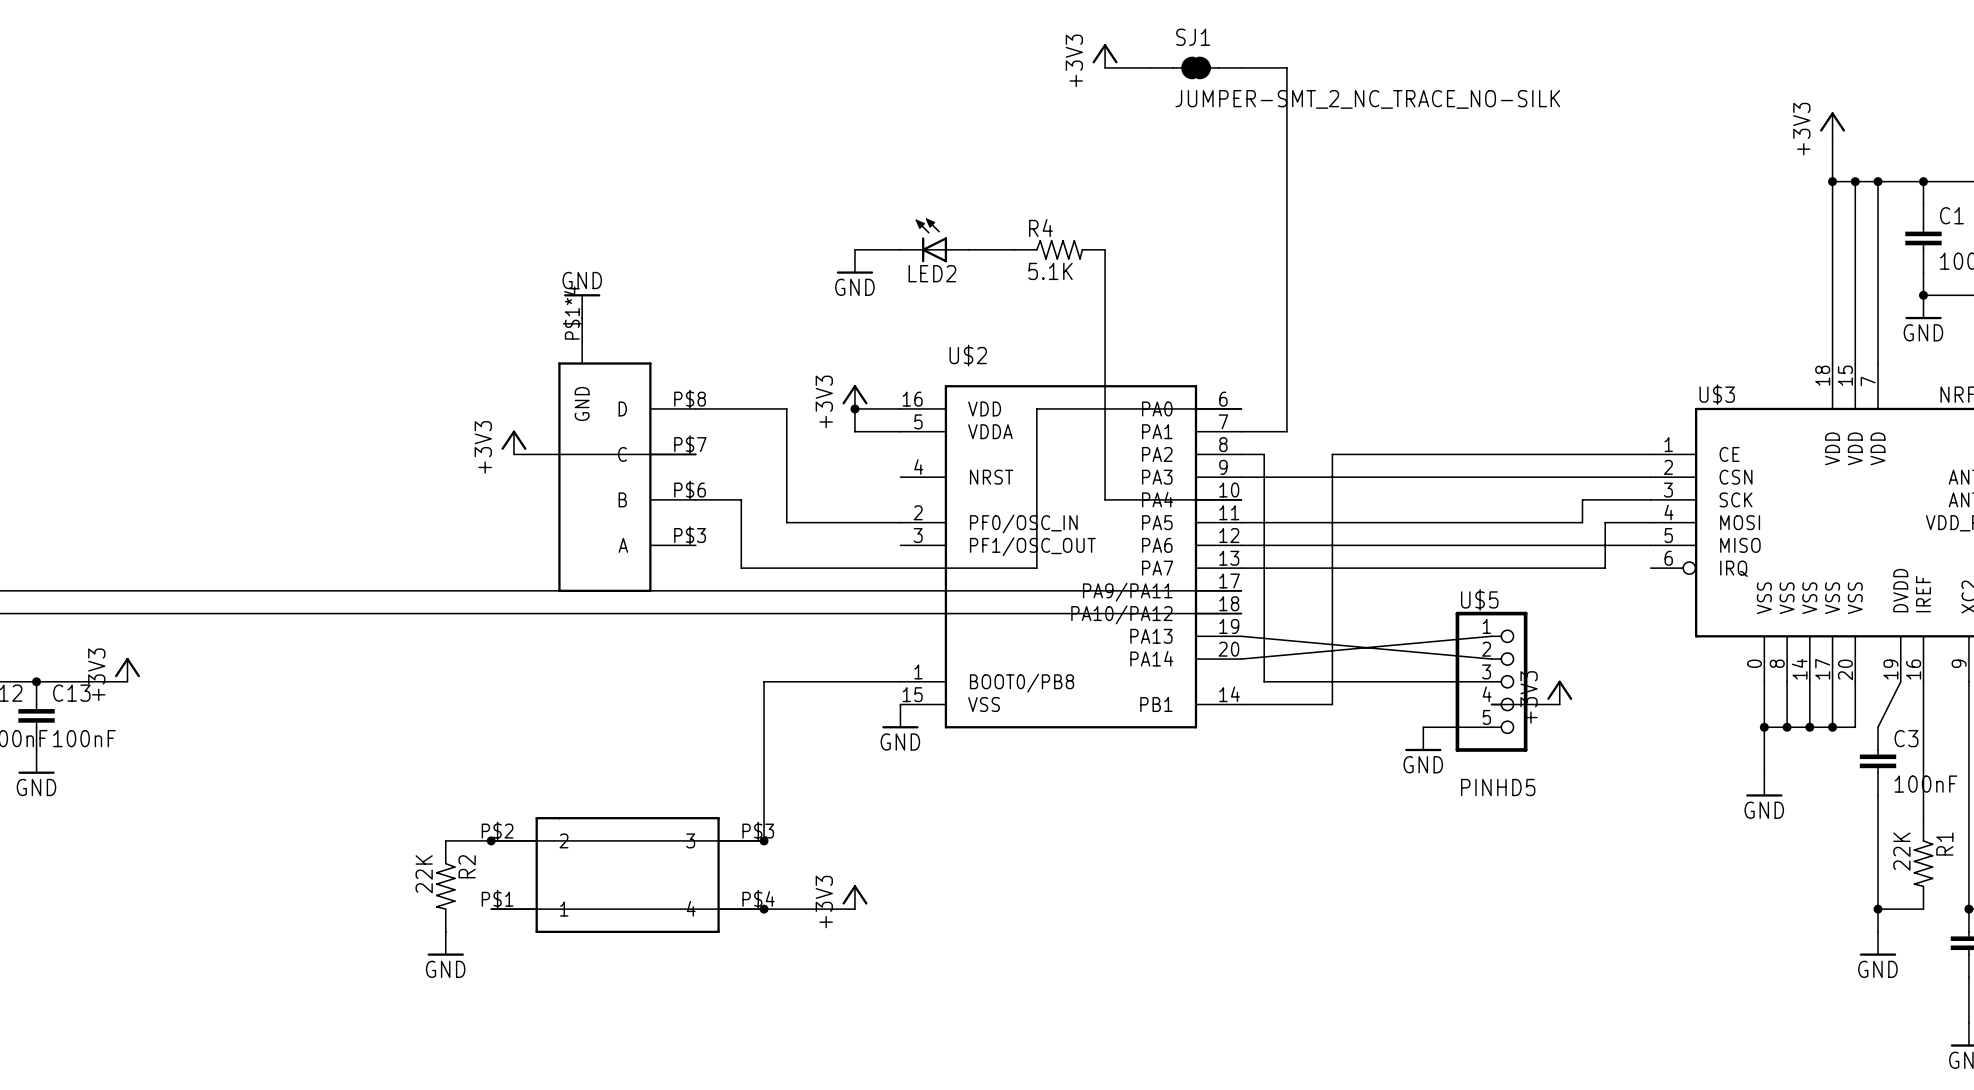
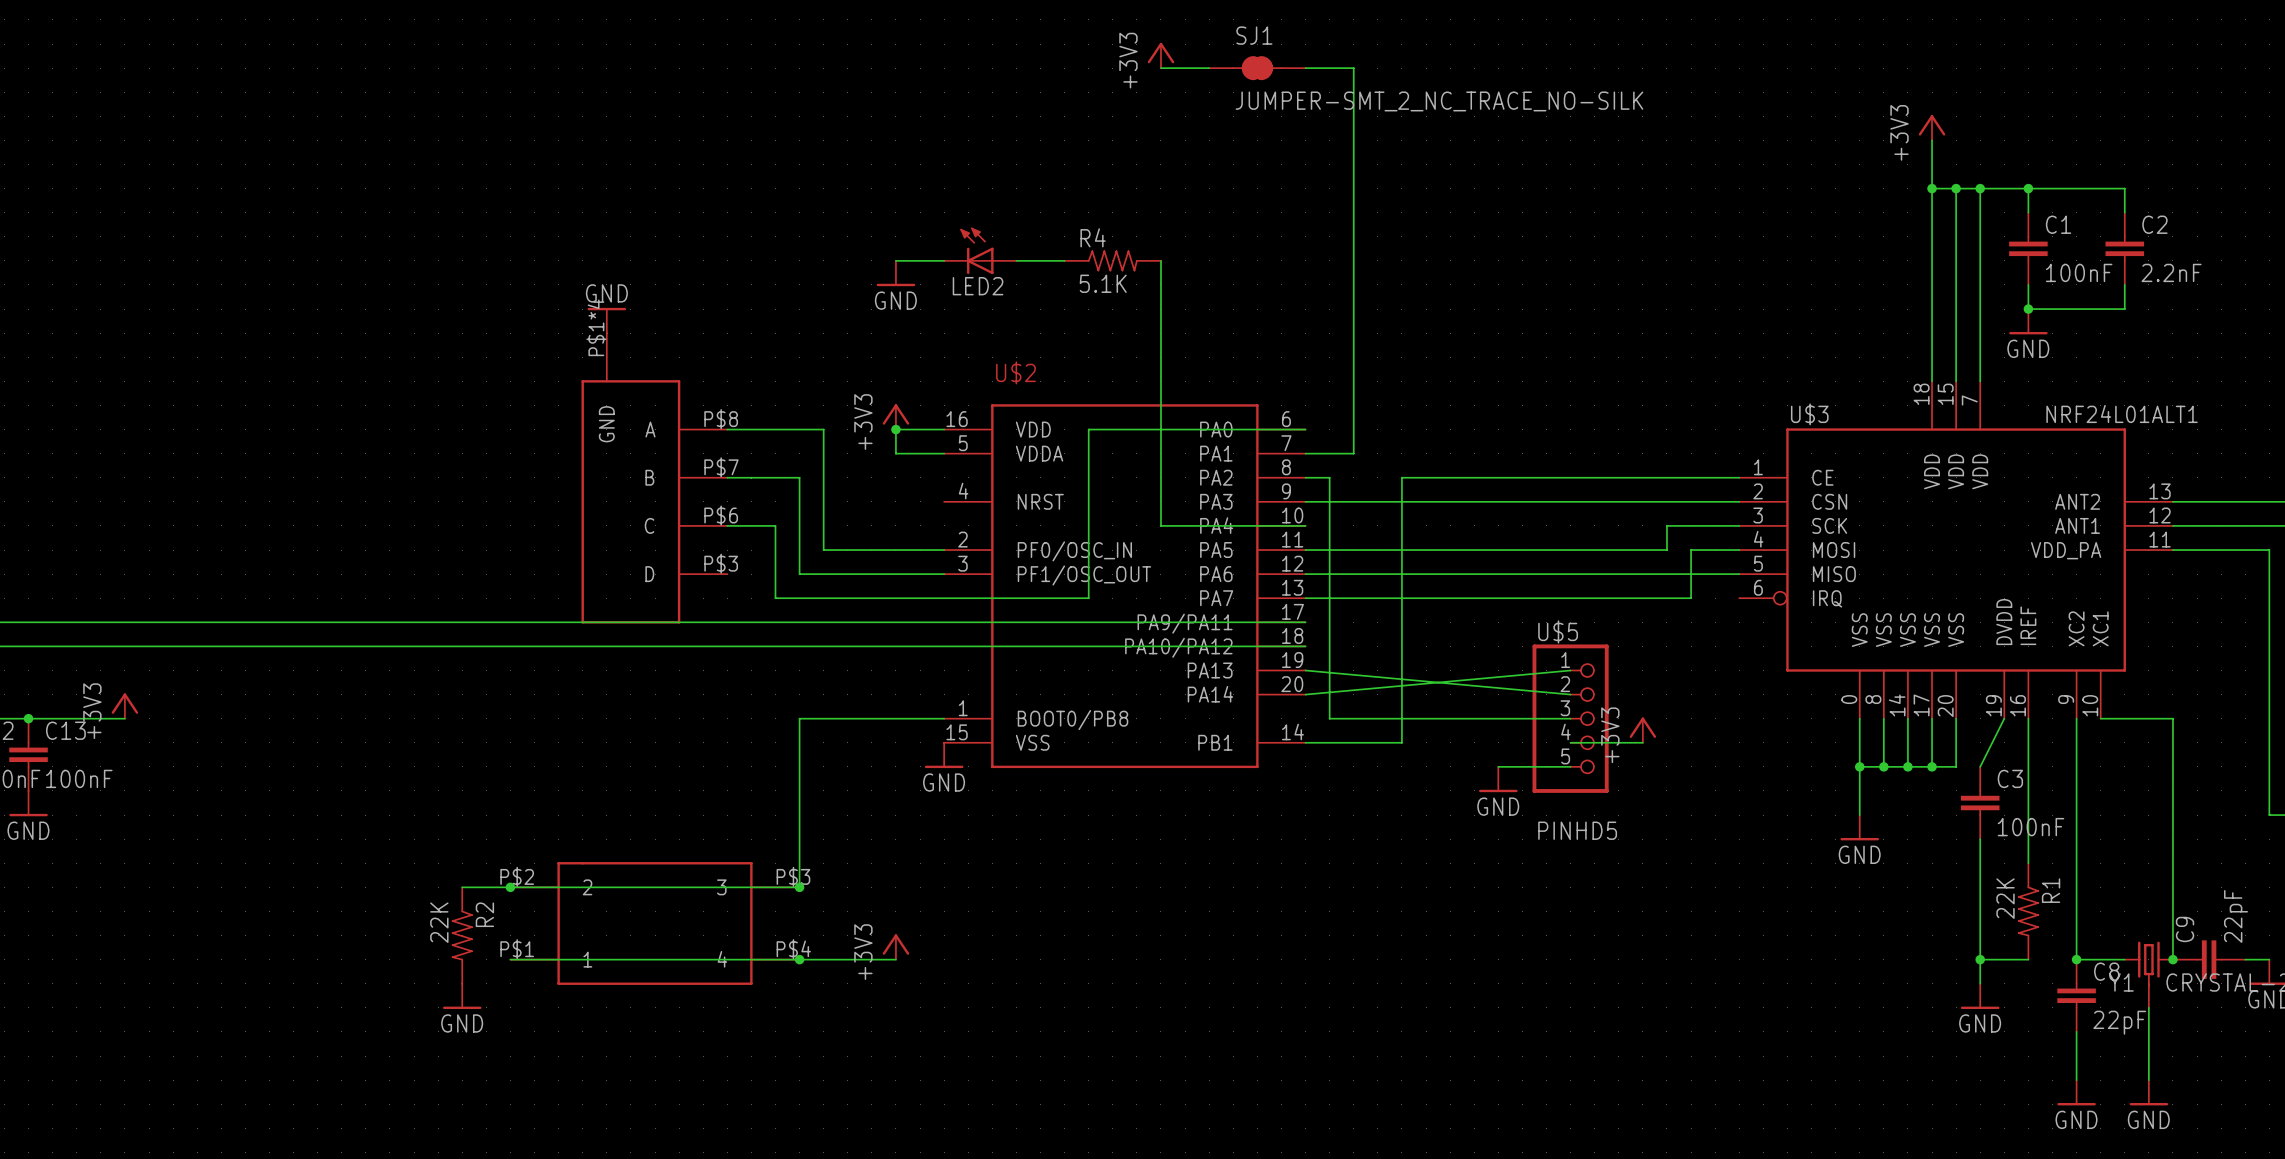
part pin name: D (622, 408) -> A (650, 429)
power symbol: +3V3 (513, 442) -> none
wire: (513, 454) (695, 454) -> (944, 574) (799, 574) (799, 477) (727, 477)
part pin name: C (622, 454) -> B (649, 477)
part pin name: B (622, 499) -> C (649, 525)
part pin name: A (623, 545) -> D (649, 574)

